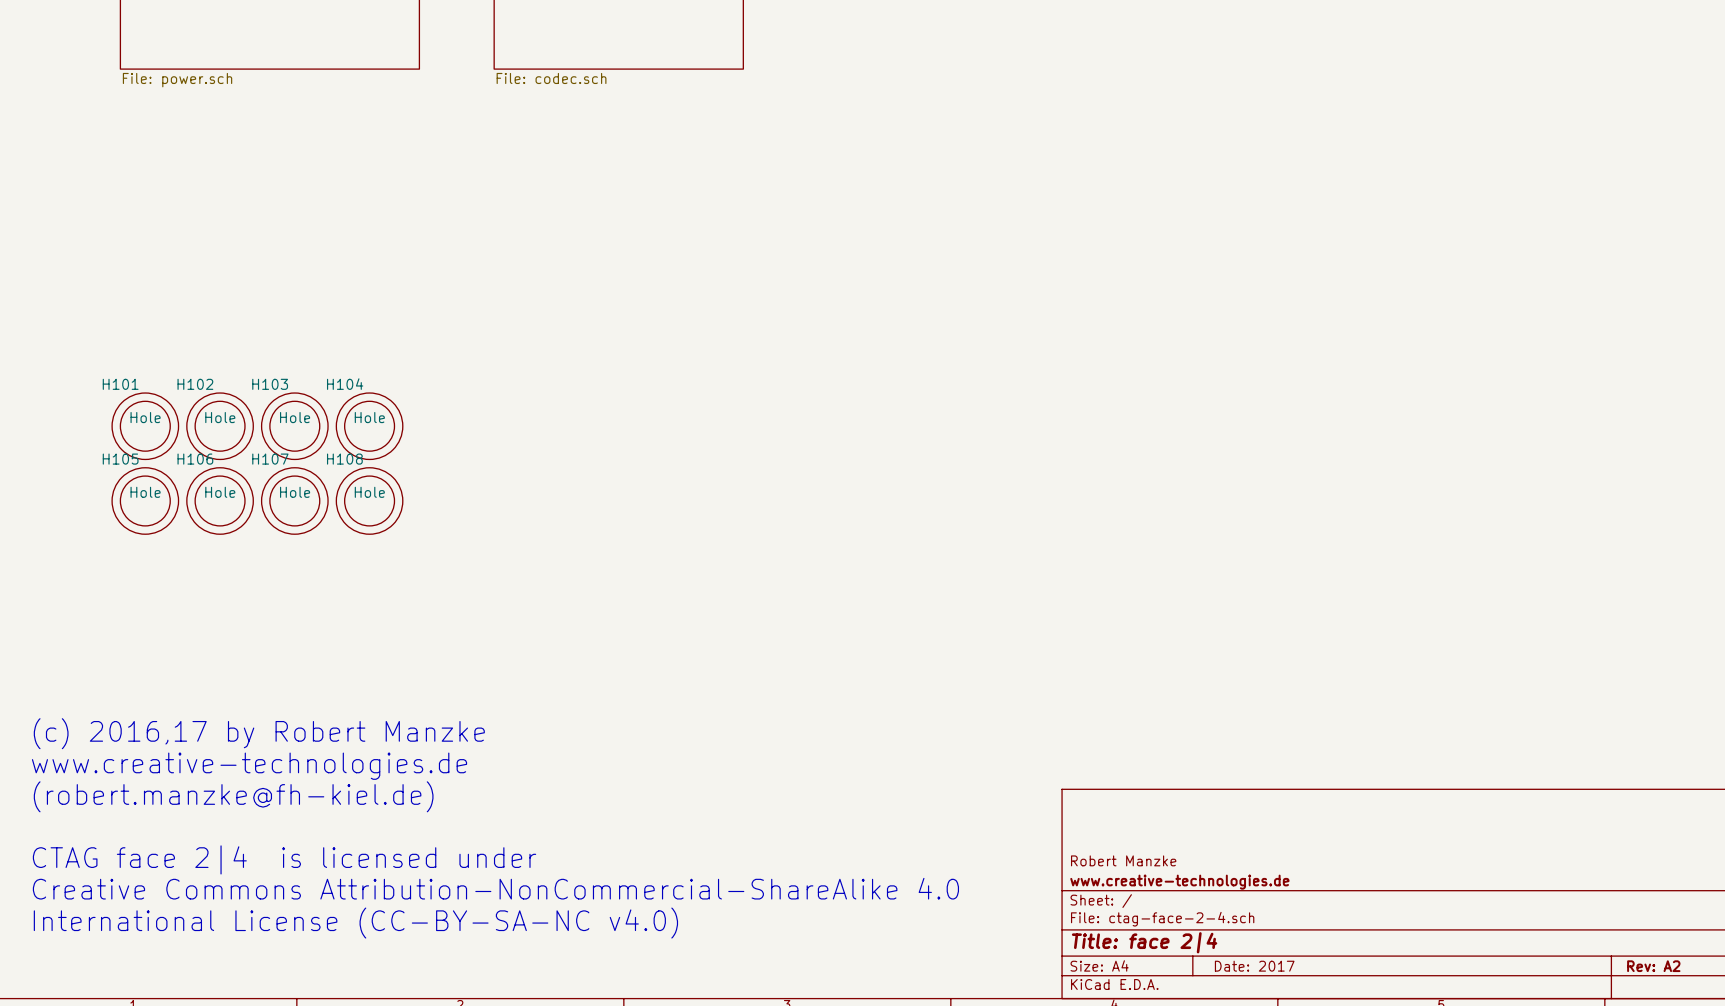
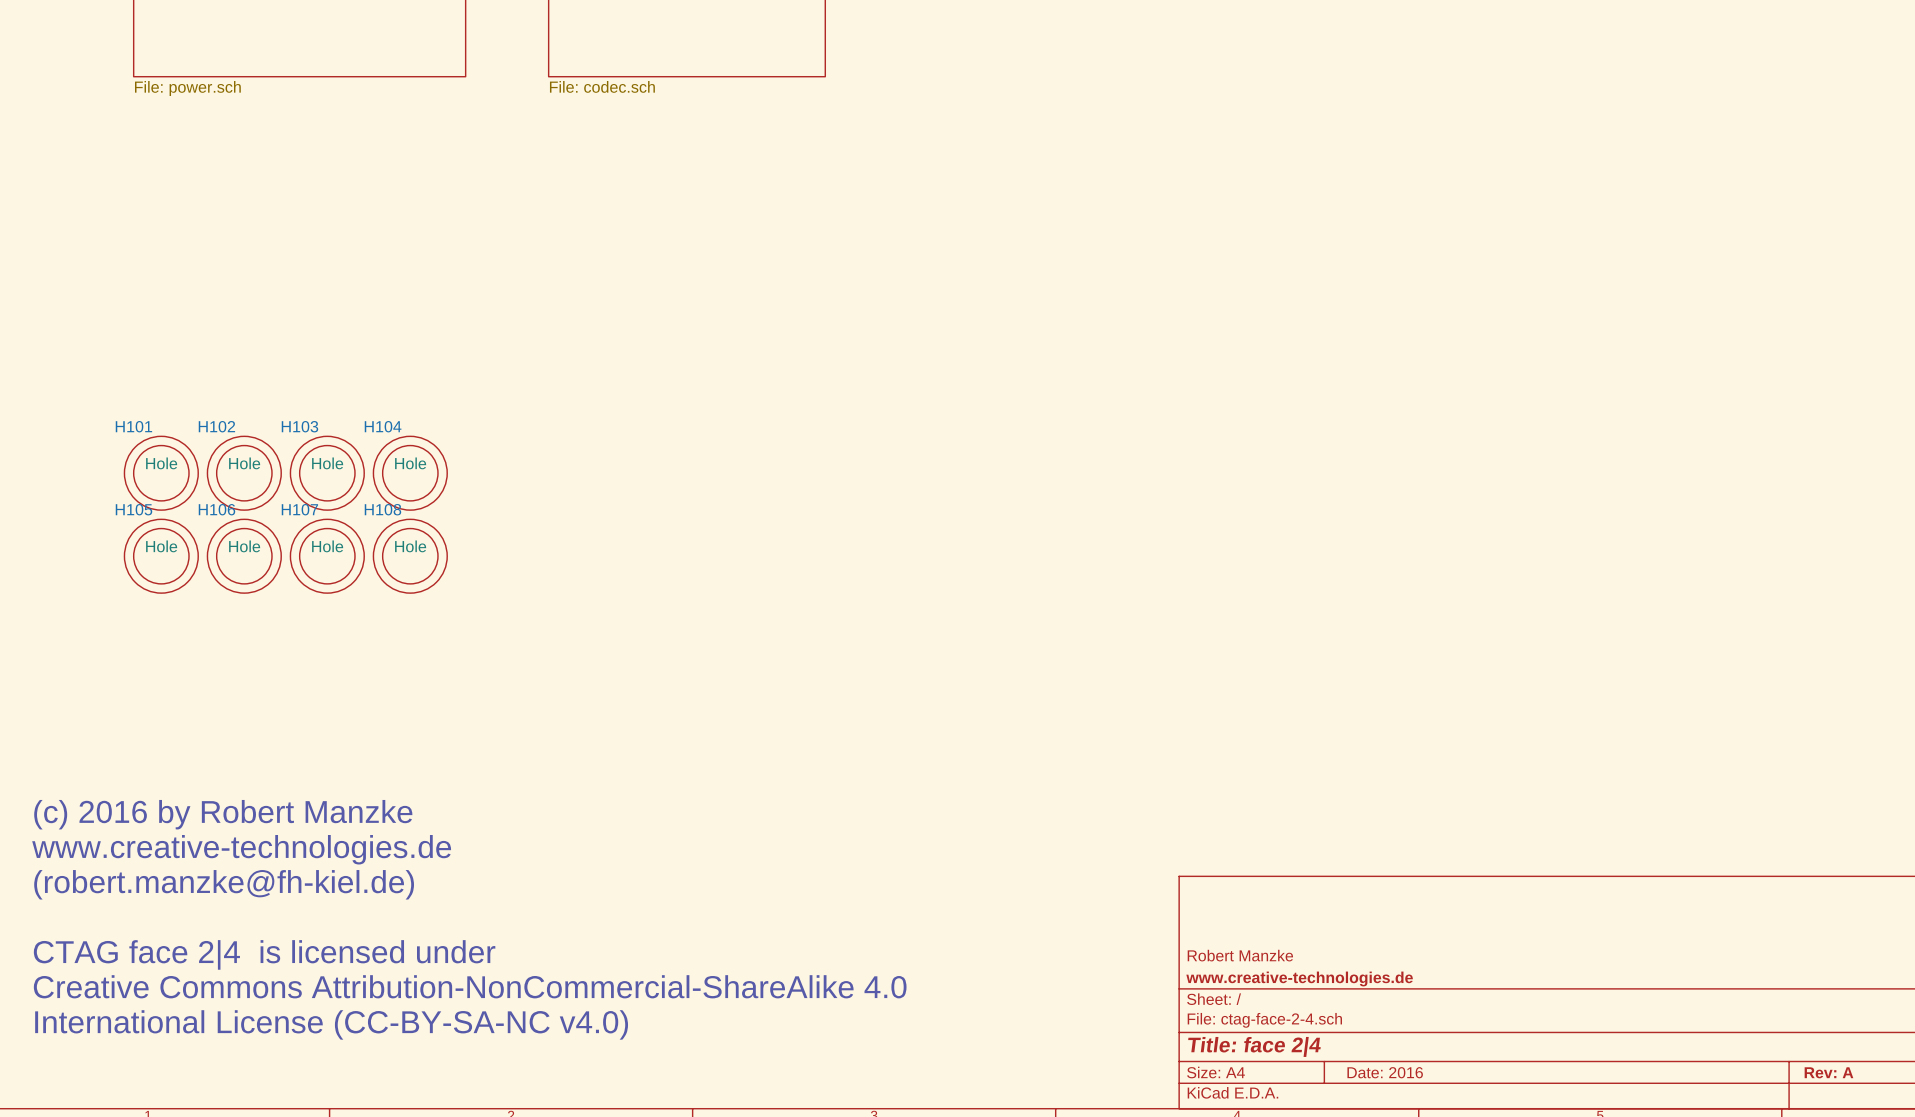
text: (c) 2016,17 by Robert Manzke (259, 733) -> (c) 2016 by Robert Manzke (223, 814)
title block: Date: 2017 (1254, 966) -> Date: 2016 (1385, 1072)
title block: Rev: A2 (1653, 966) -> Rev: A (1828, 1072)

